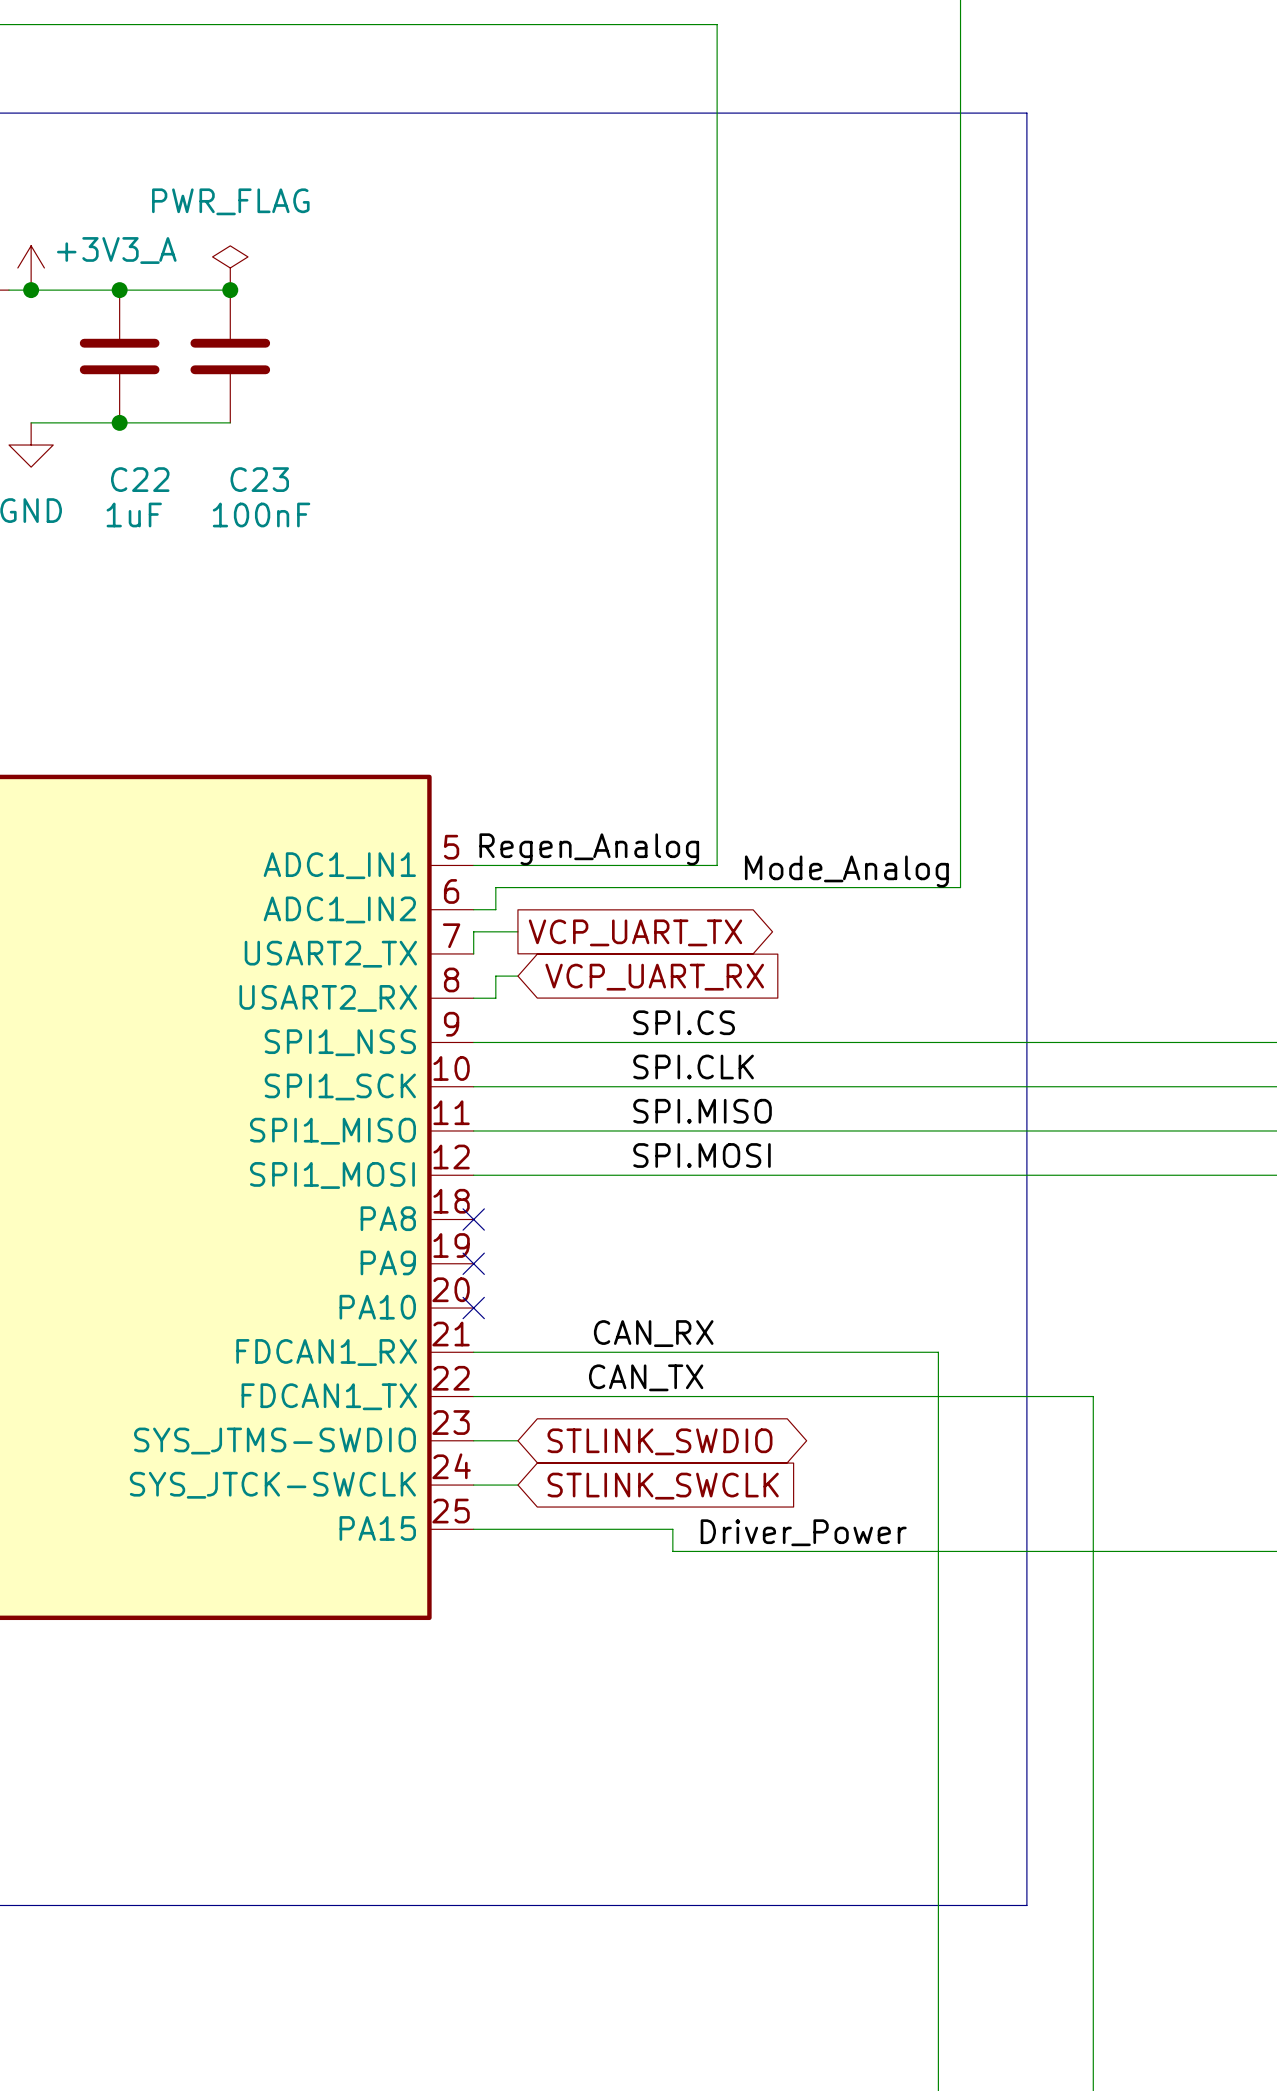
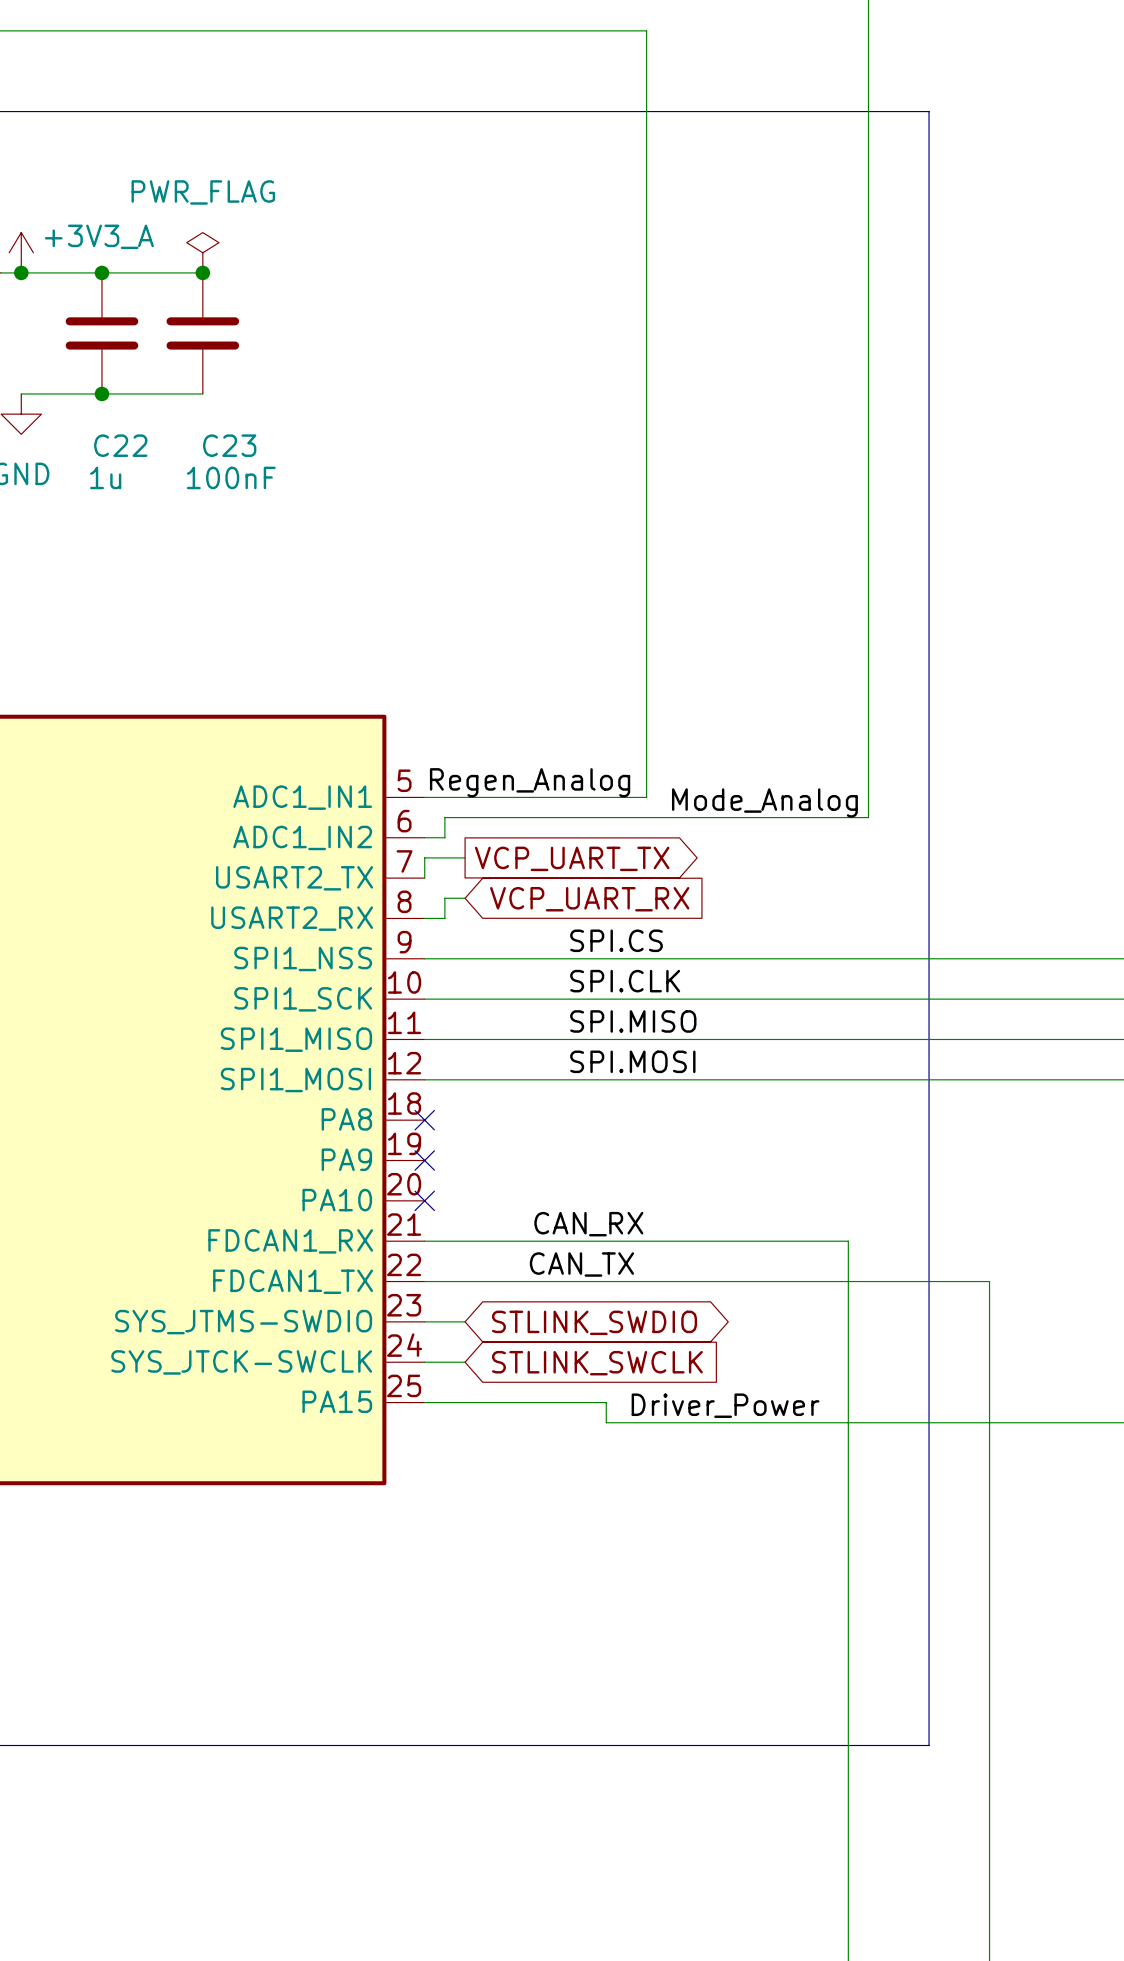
C22 value: 1uF (134, 515) -> 1u (105, 477)

